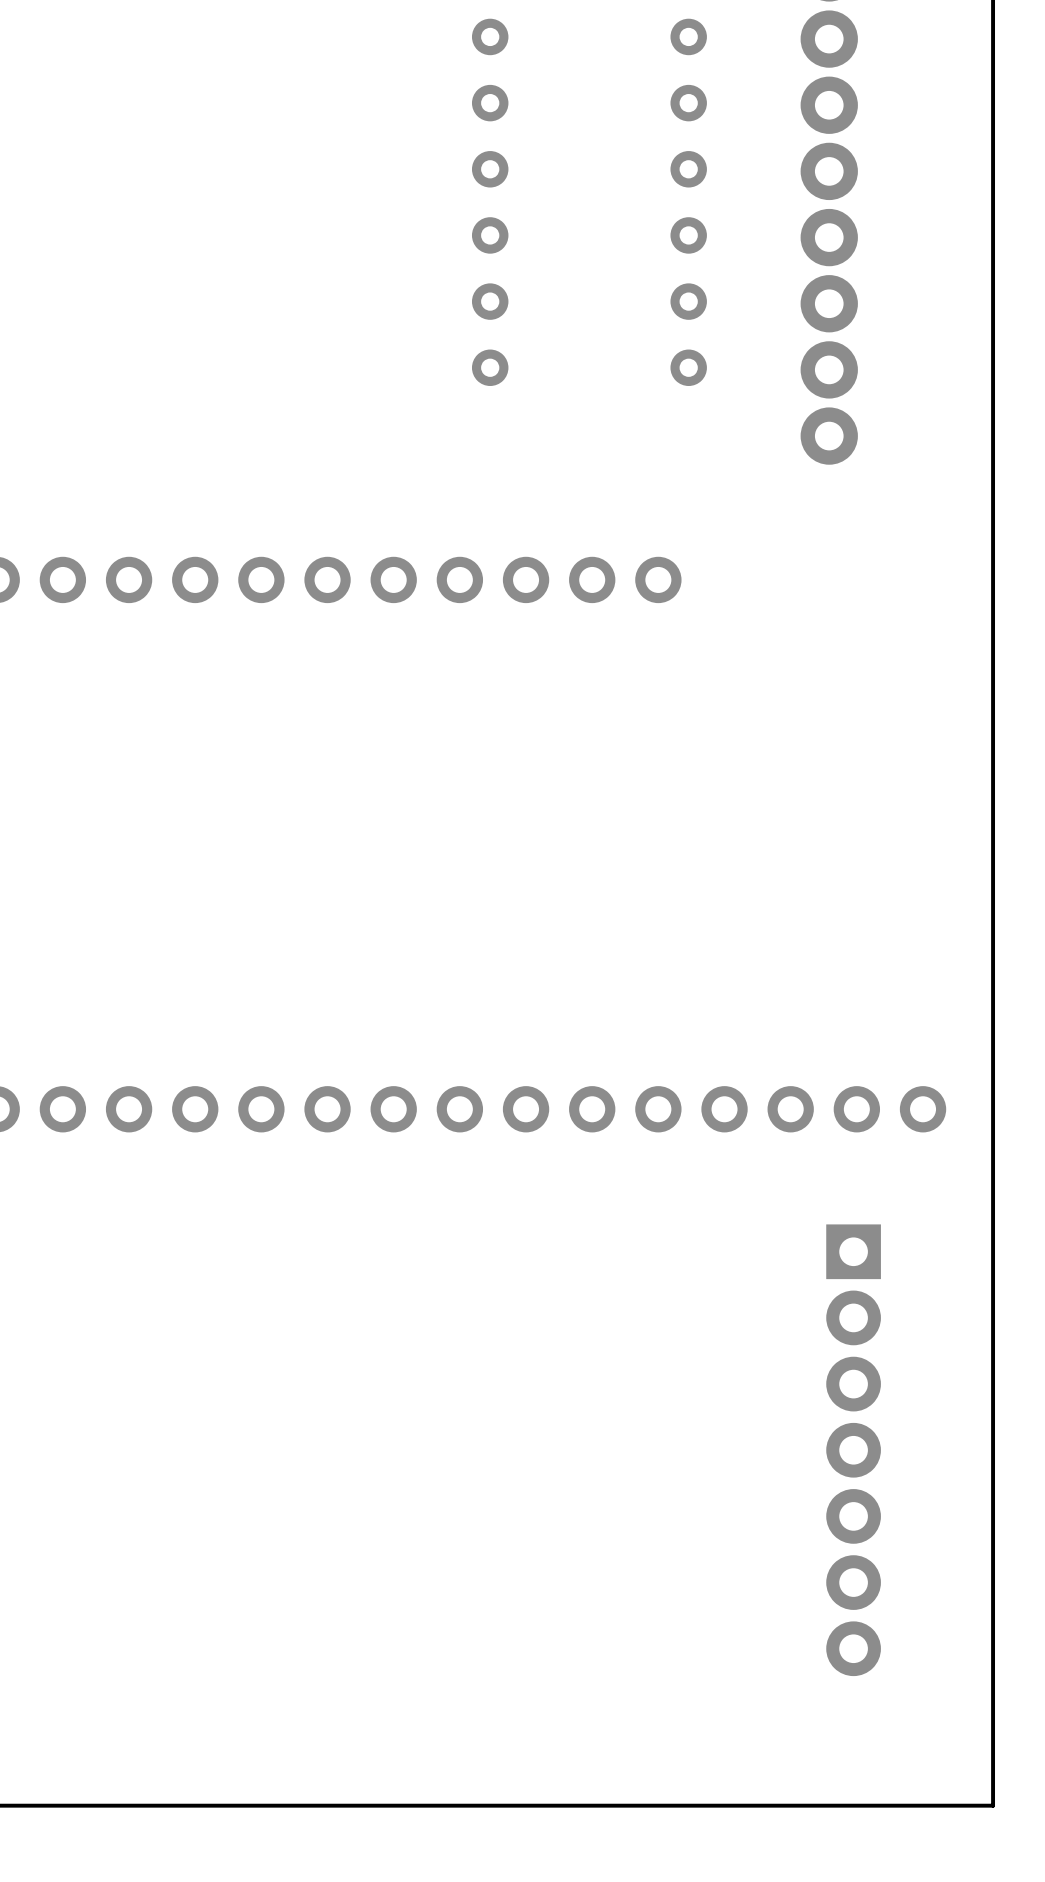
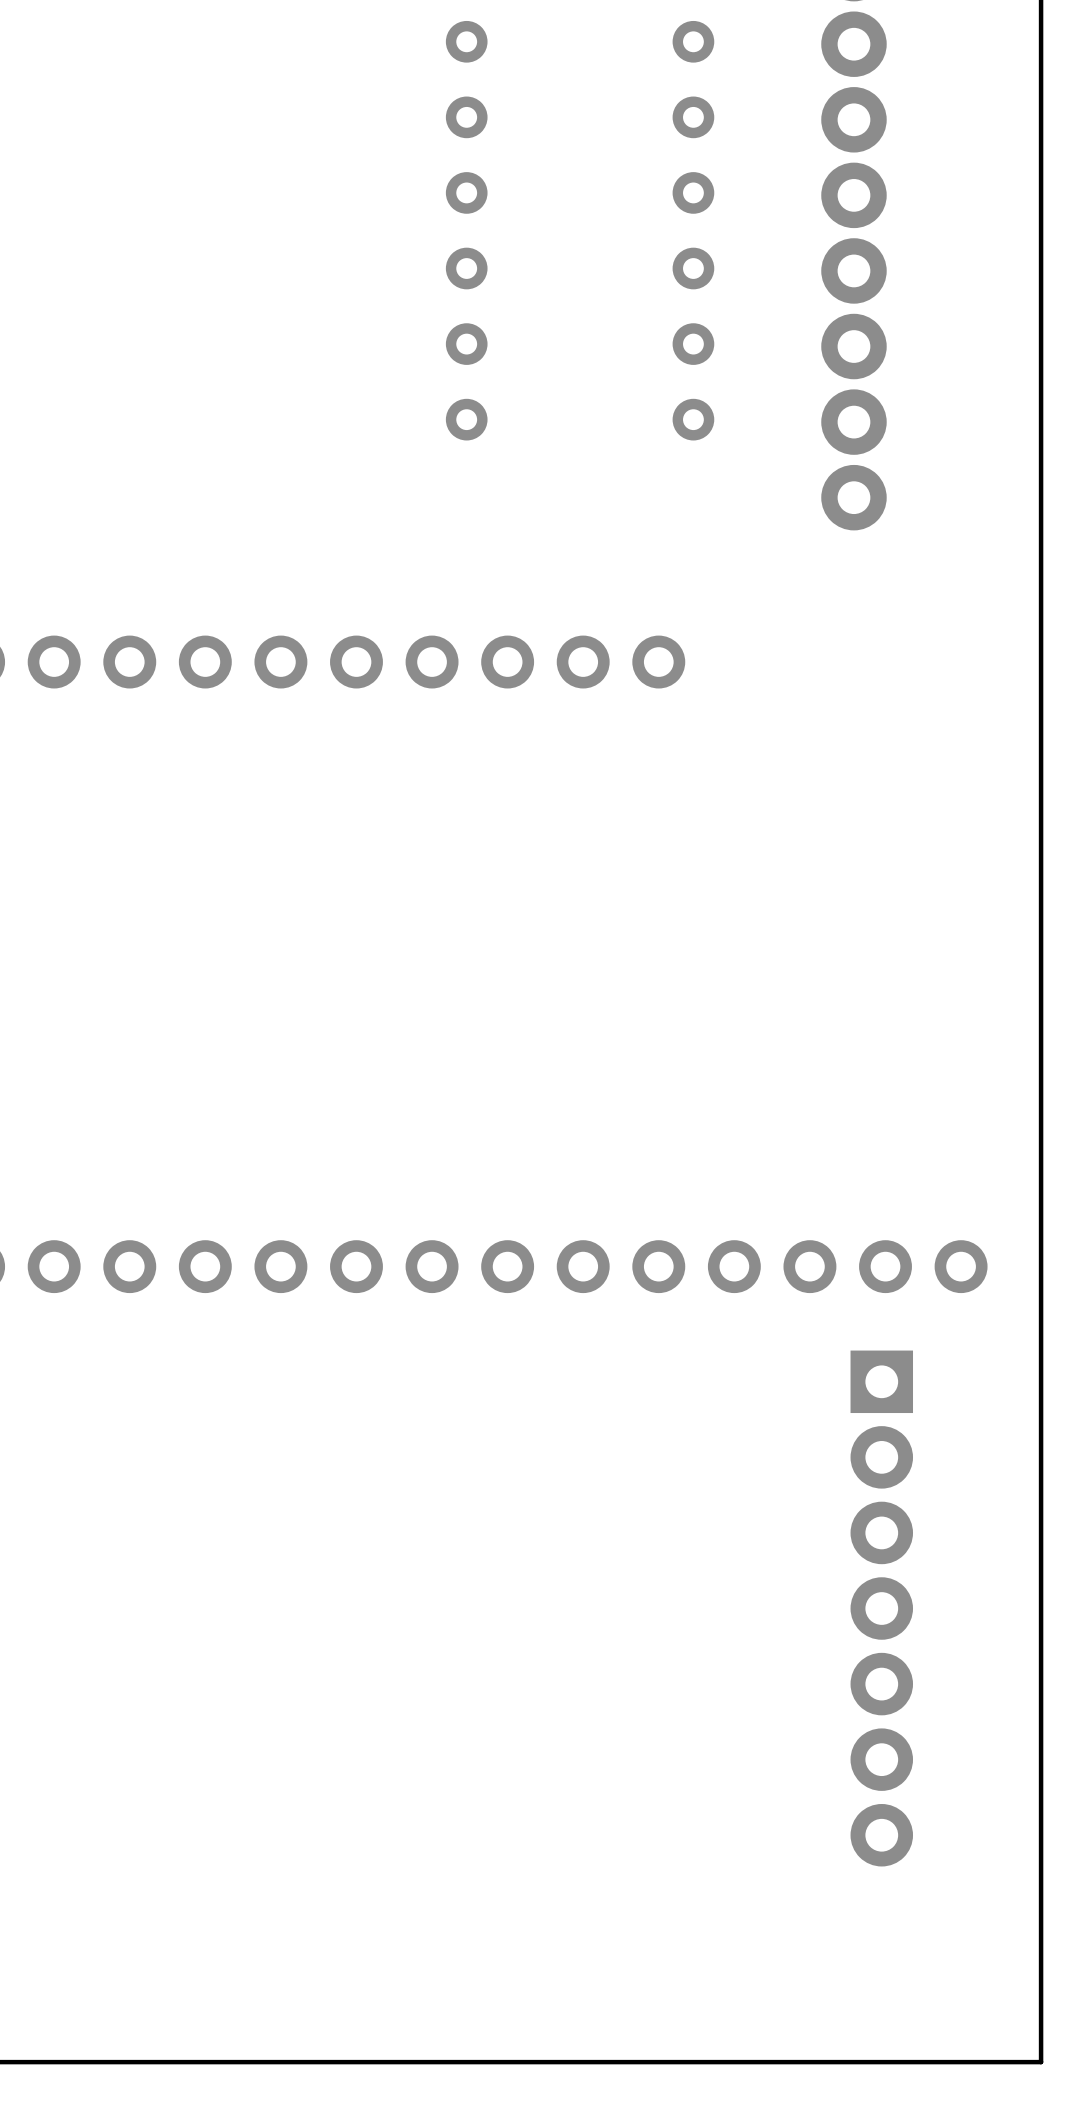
part position: (853, 1450) -> (881, 1608)

